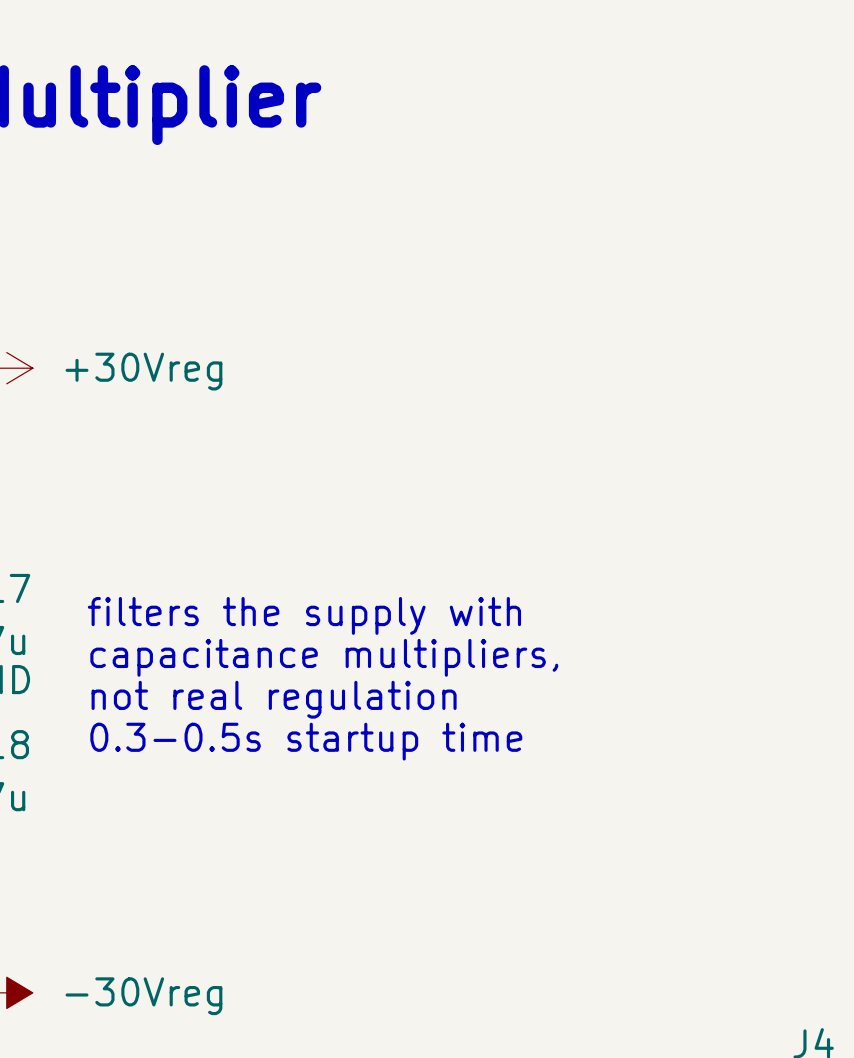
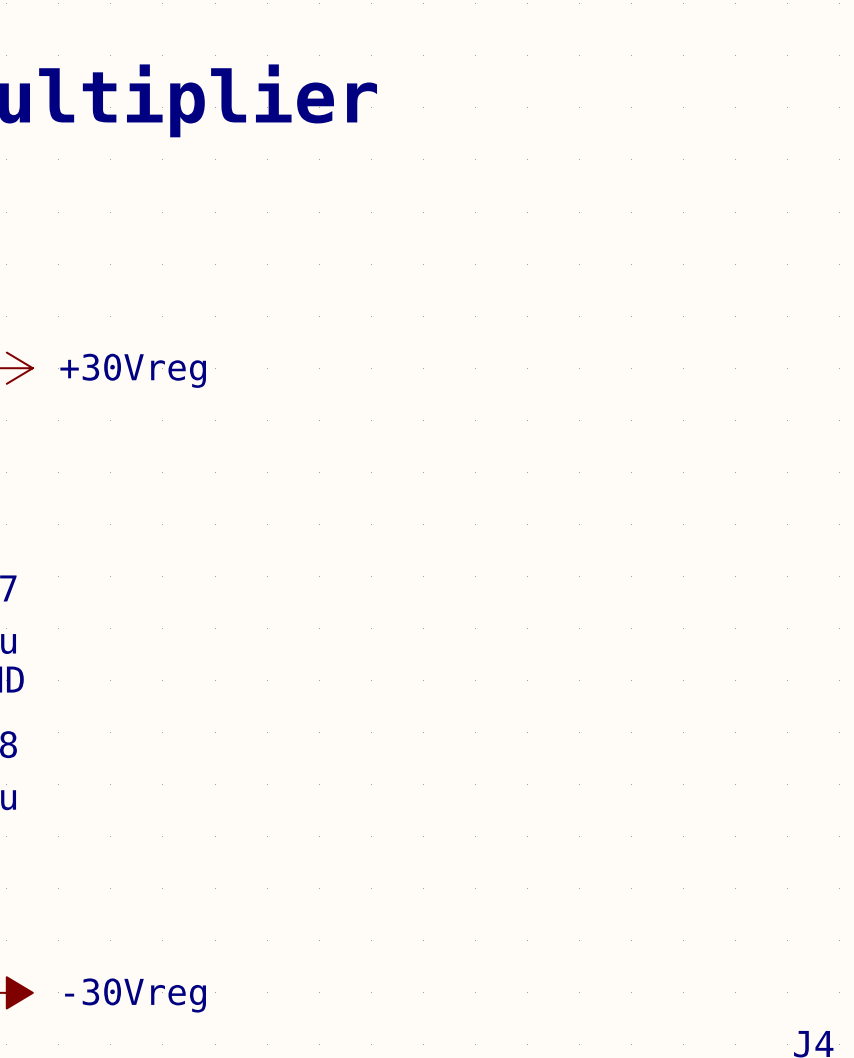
text: filters the supply with (304, 615) -> none
text: capacitance multipliers, (324, 657) -> none
text: not real regulation (274, 699) -> none
text: 0.3-0.5s startup time (306, 741) -> none

